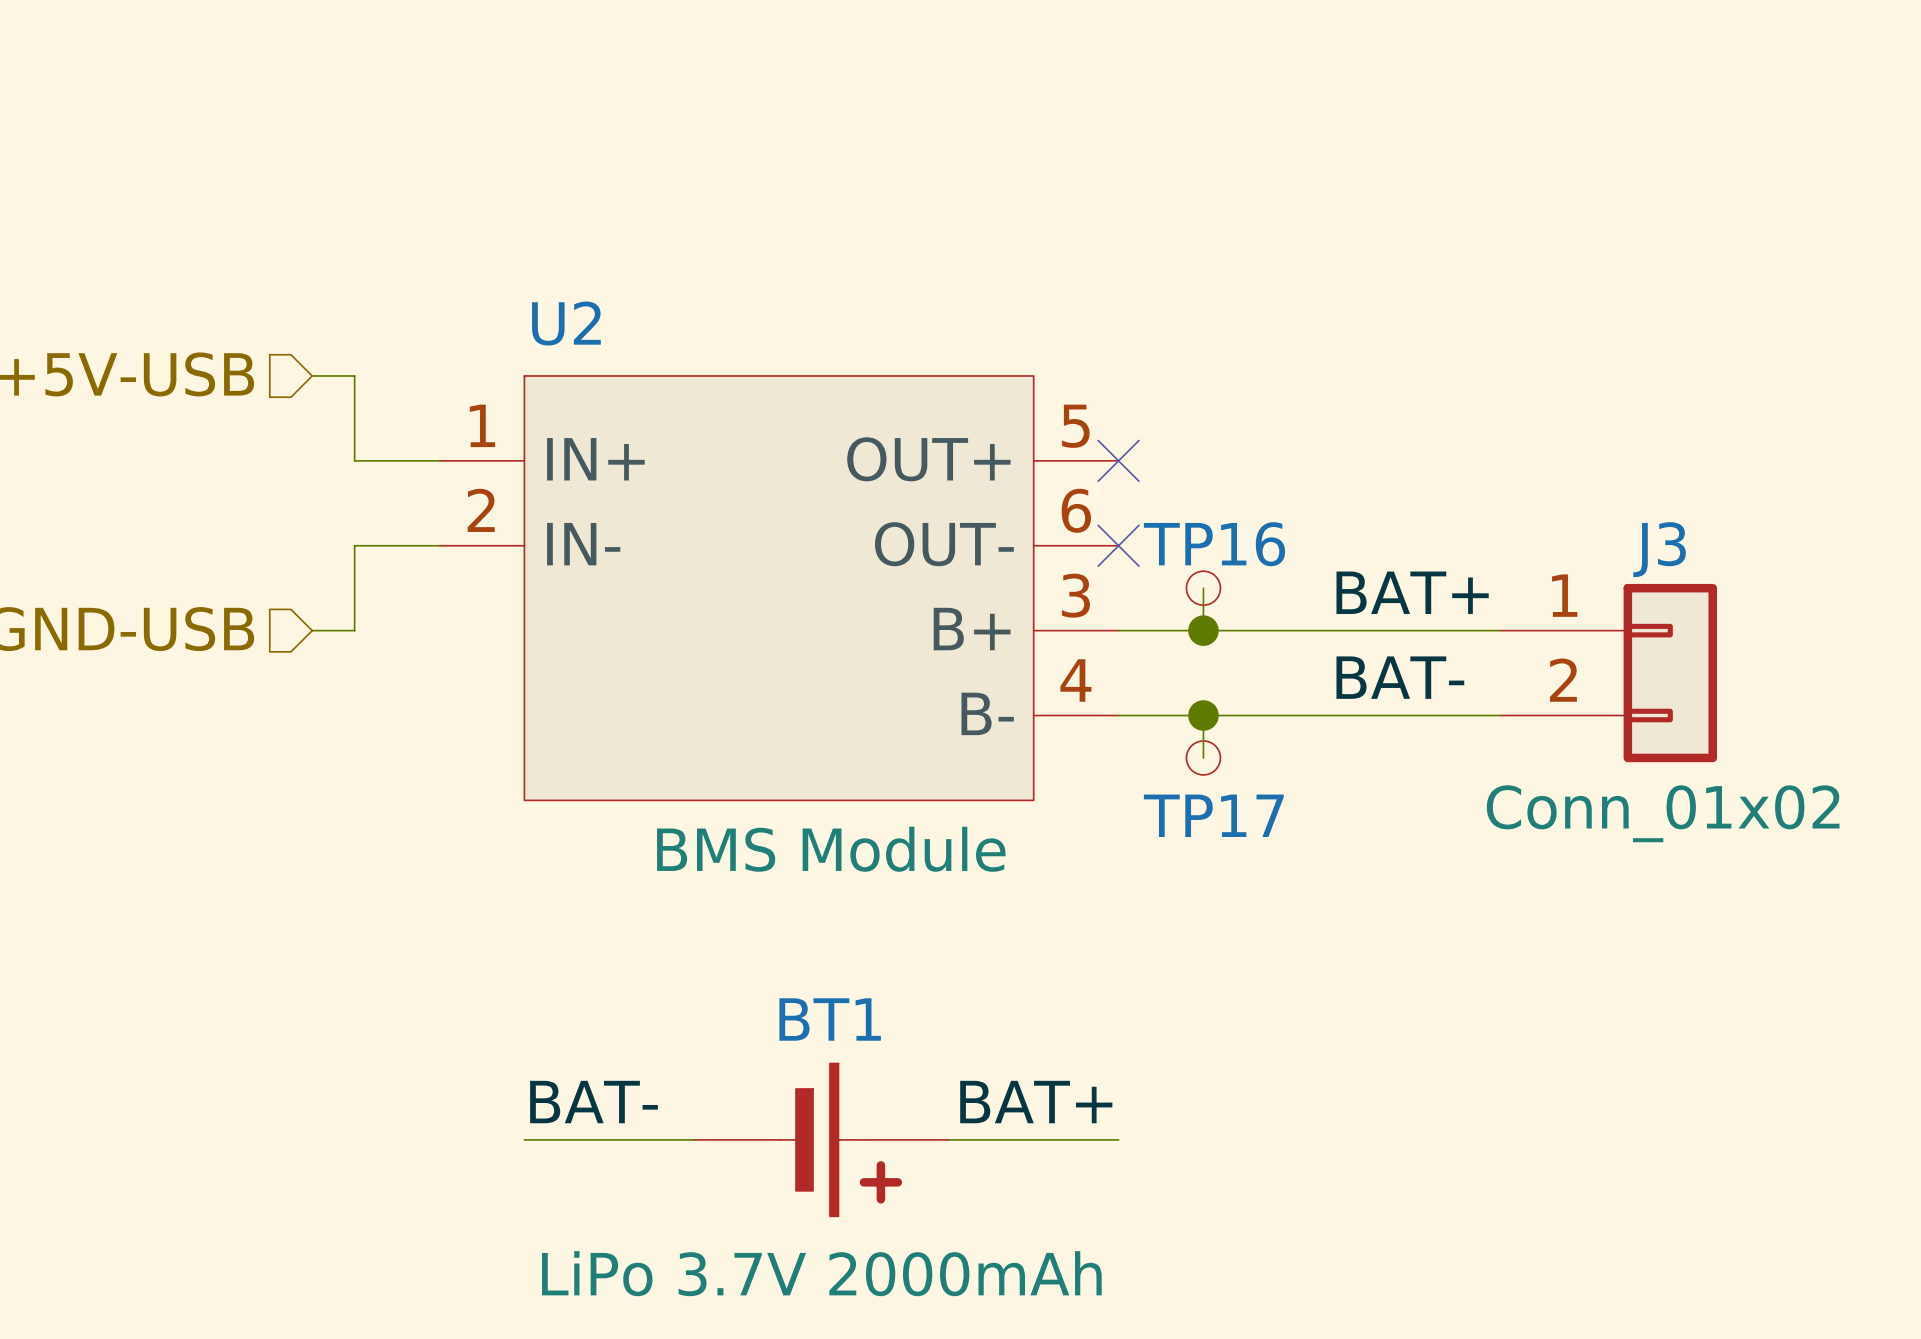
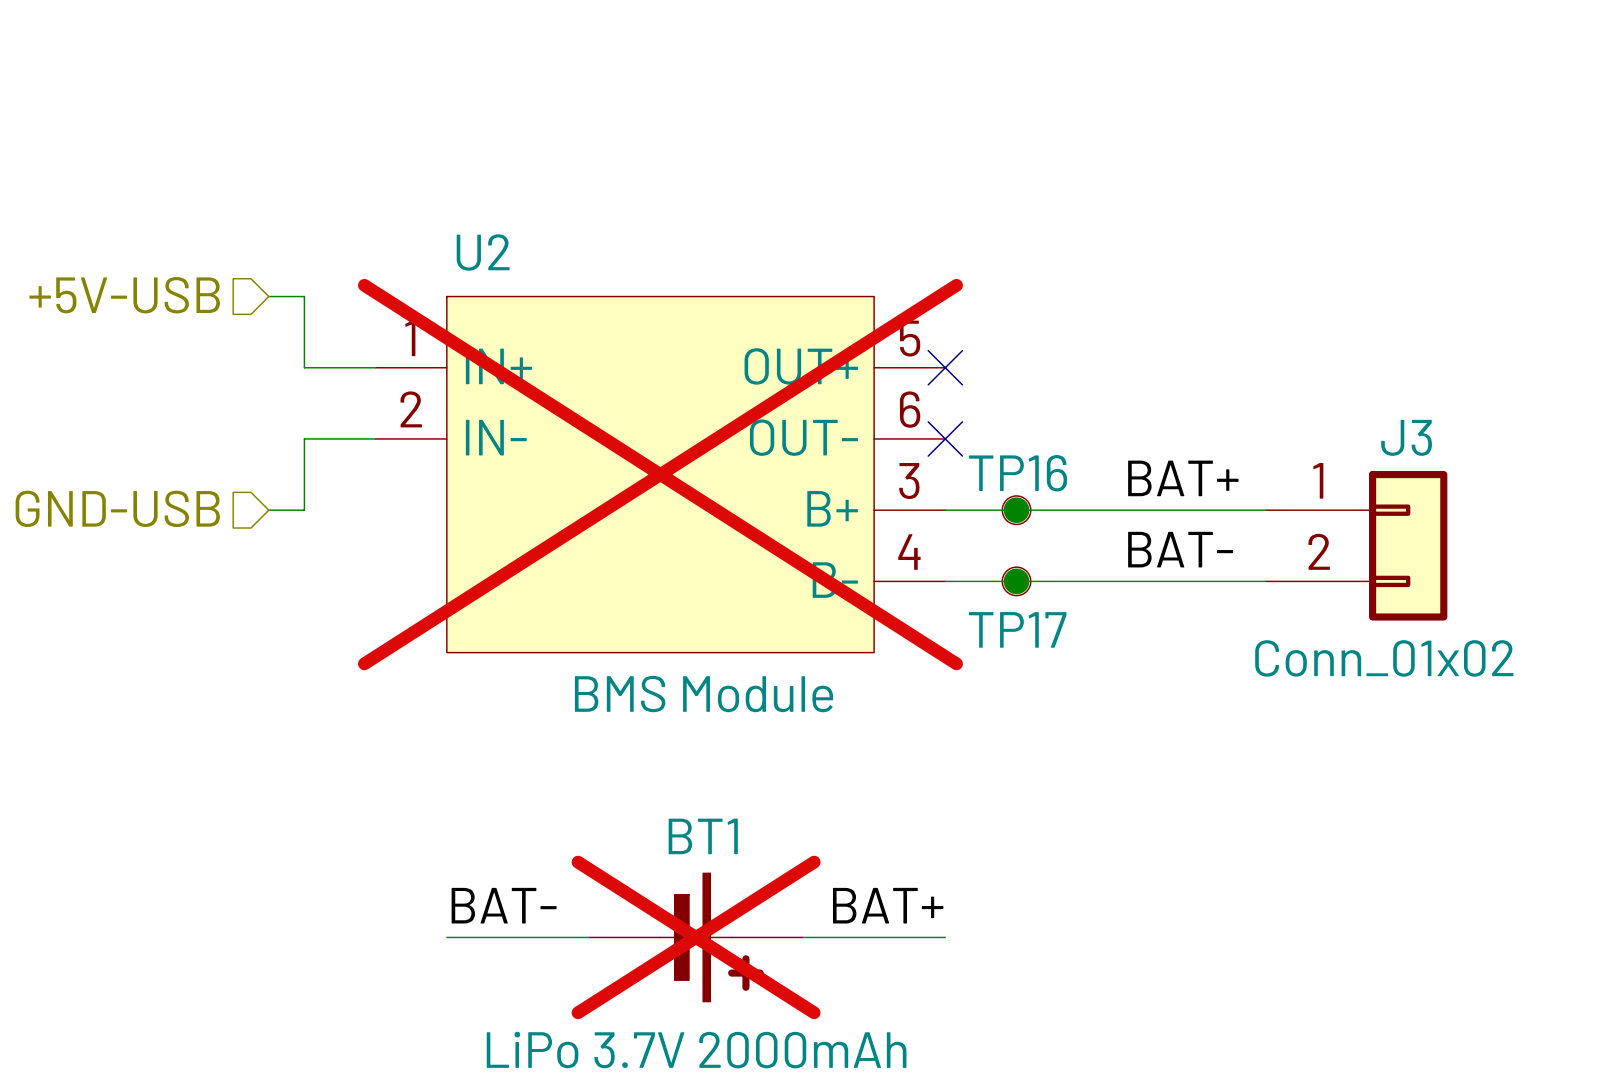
U2 do-not-place cross: none -> (660, 474)
wire: (1203, 588) (1203, 630) -> none
TP16 position: (1203, 588) -> (1016, 510)
wire: (1203, 715) (1203, 757) -> none
TP17 position: (1203, 757) -> (1016, 581)
BT1 do-not-place cross: none -> (696, 937)

